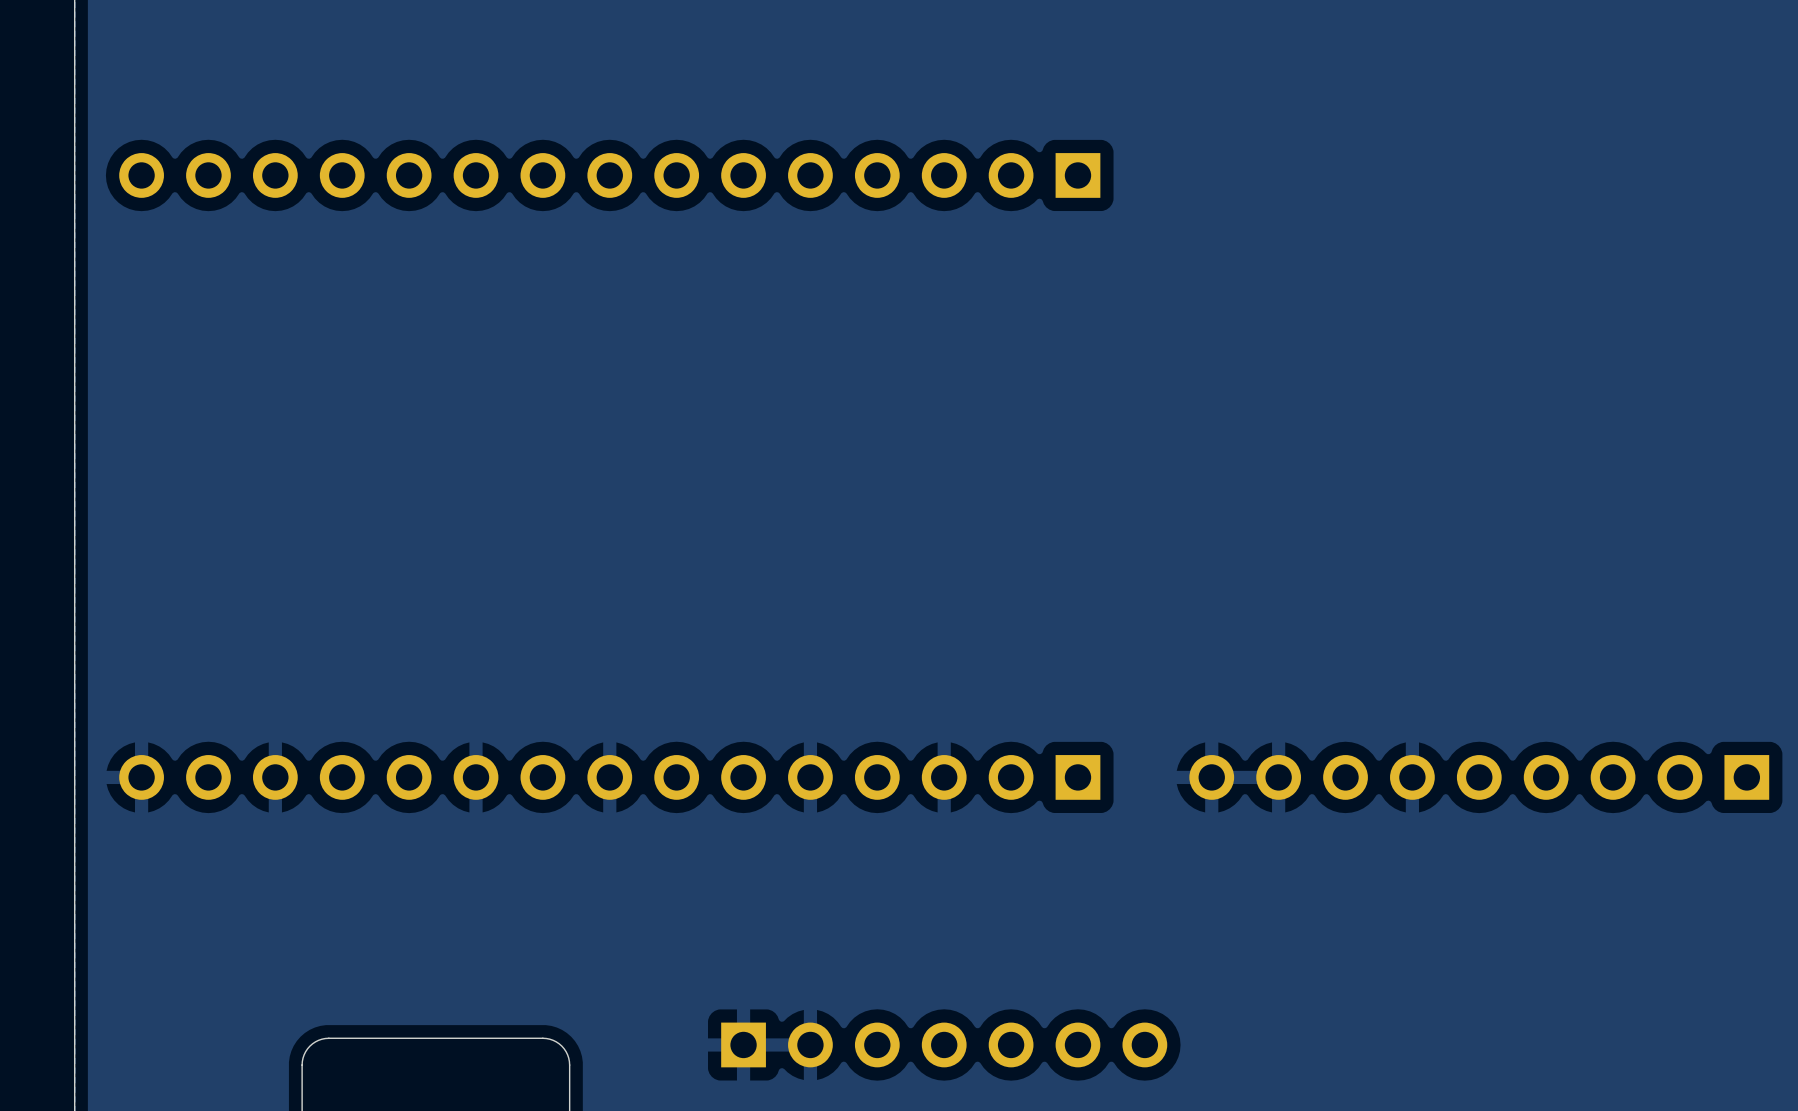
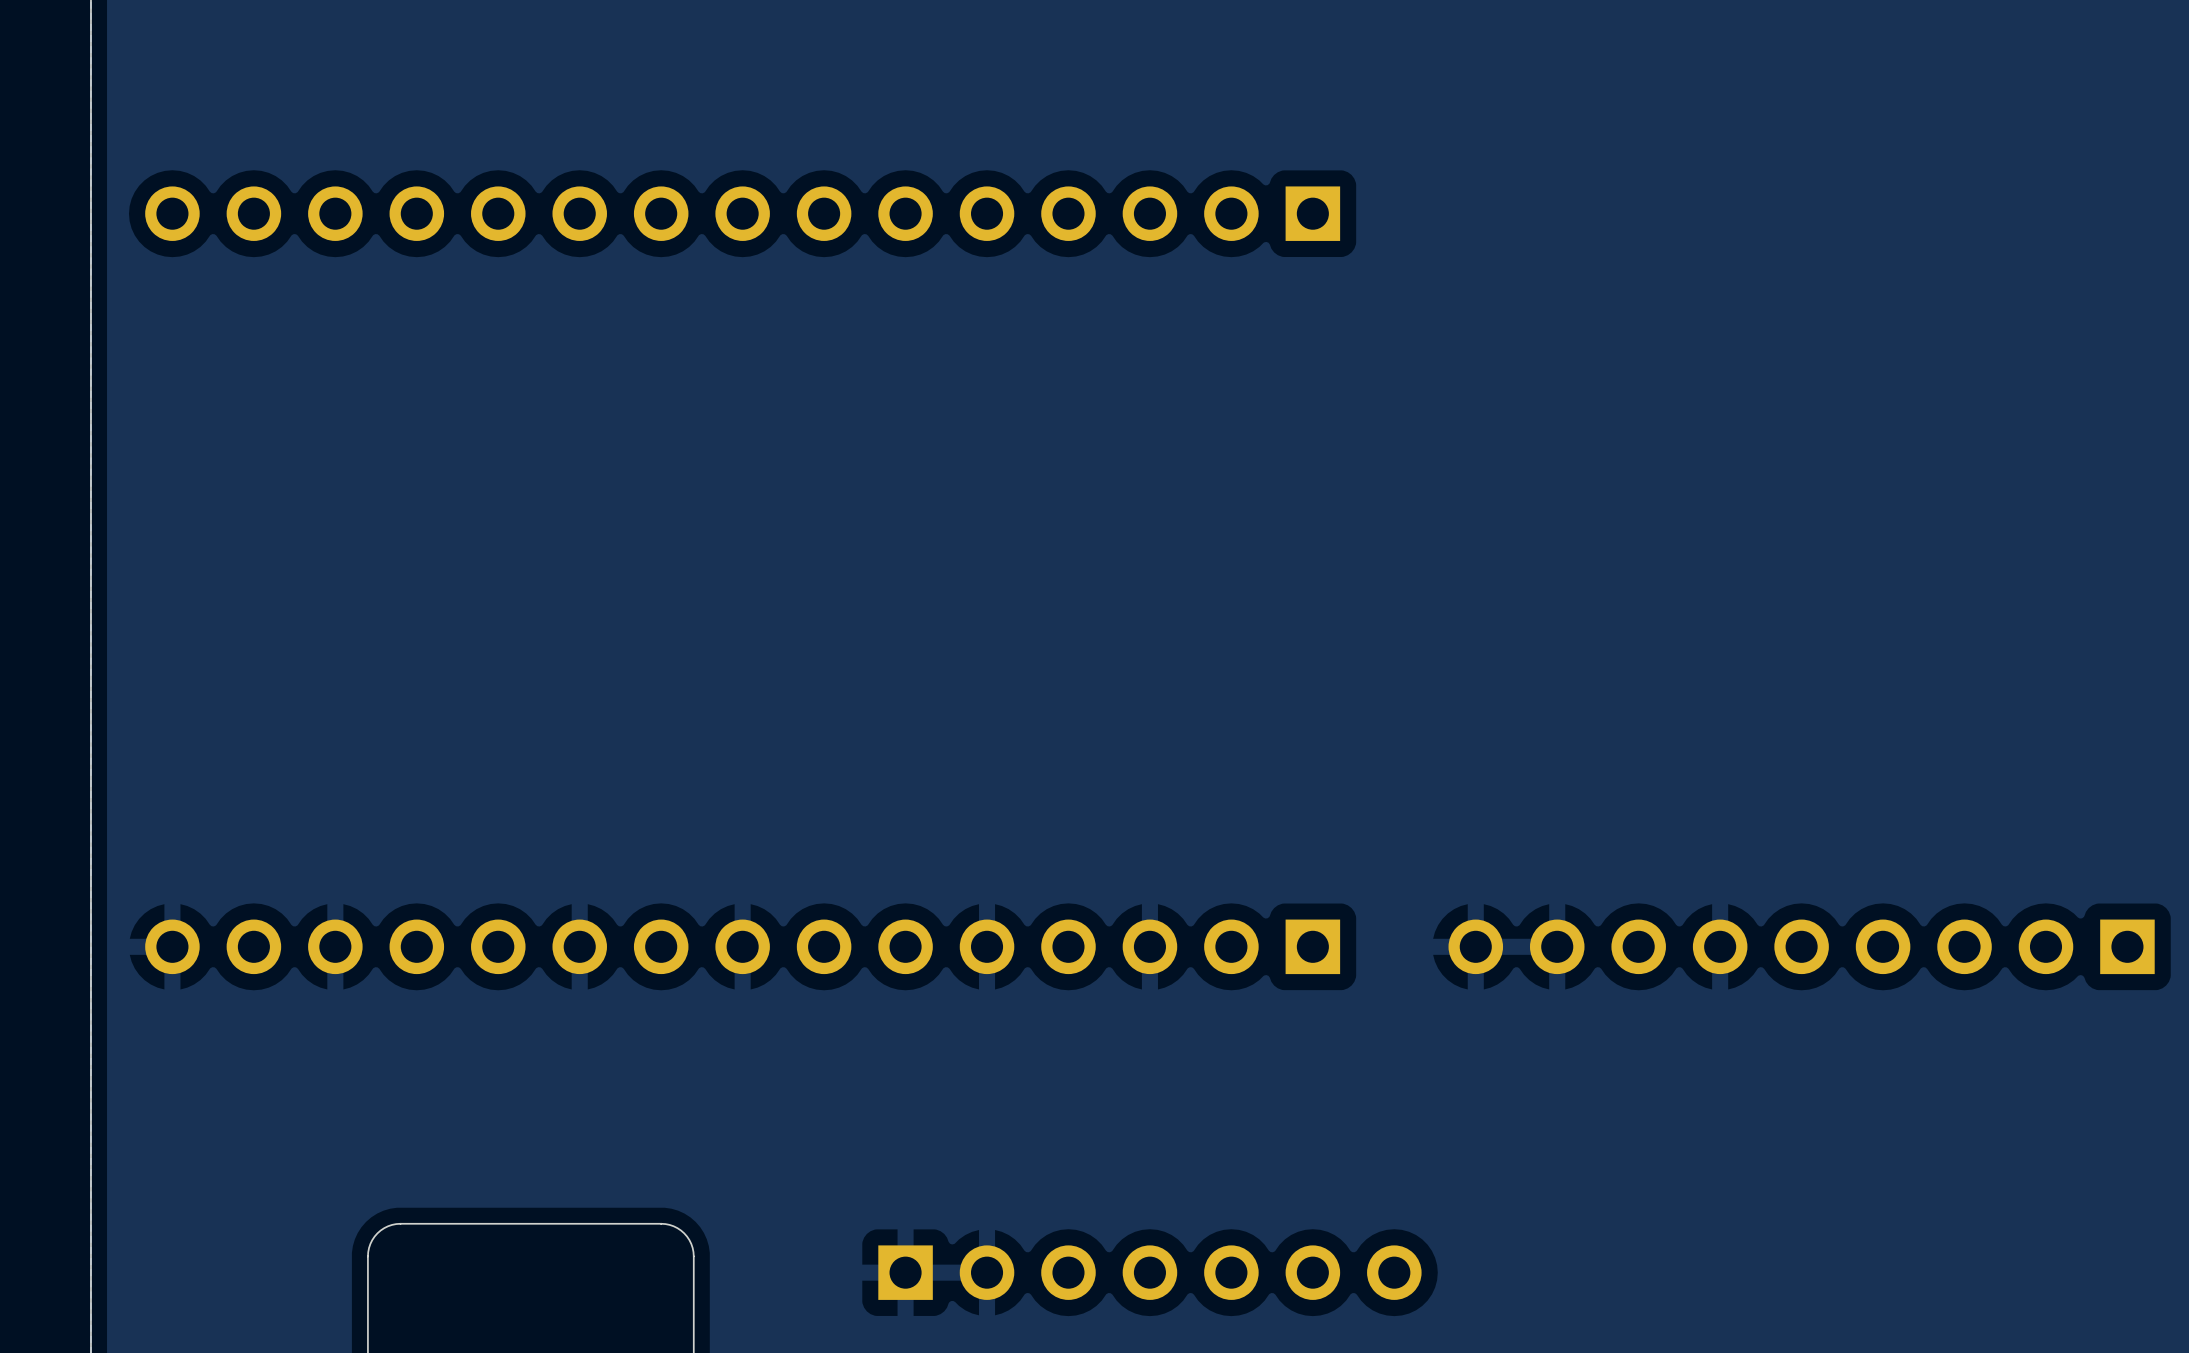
board edge: (569, 1065) (567, 1054) (561, 1046) (553, 1040) (542, 1038) (325, 1038) (315, 1041) (307, 1048) (302, 1065) -> (693, 1297) (693, 1256) (691, 1243) (681, 1230) (673, 1226) (661, 1223) (392, 1224) (377, 1233) (369, 1247) (367, 1297)

